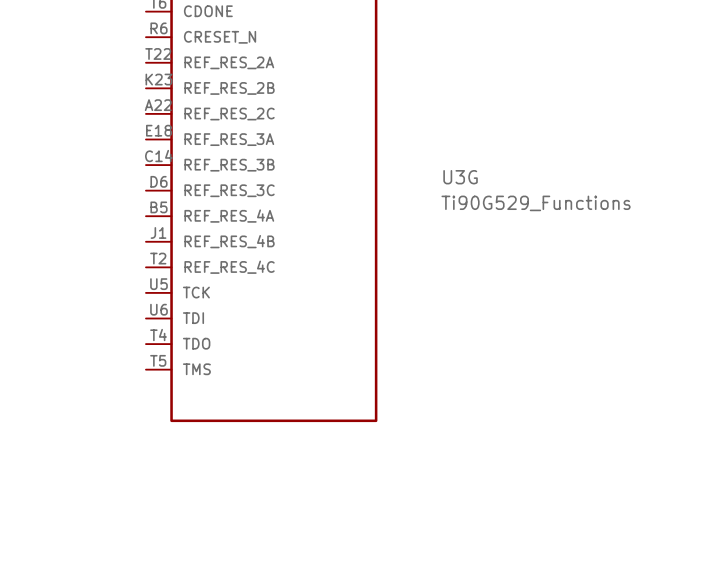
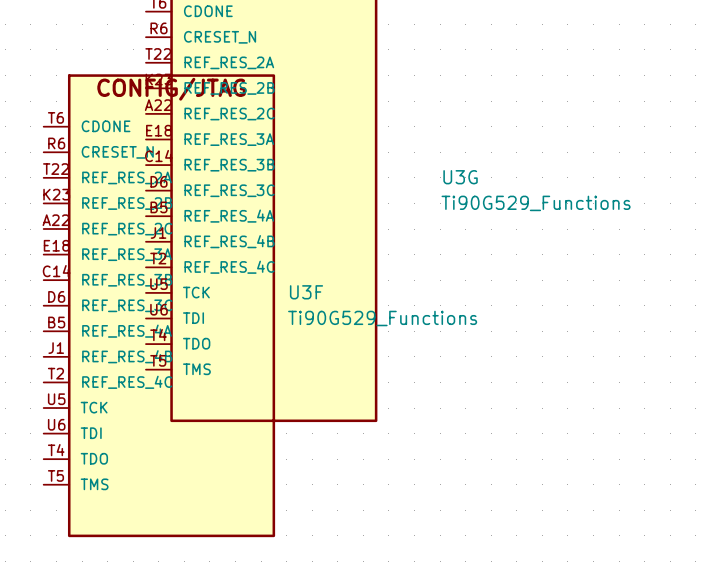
U3F: none -> Ti90G529_Functions (159, 305)

